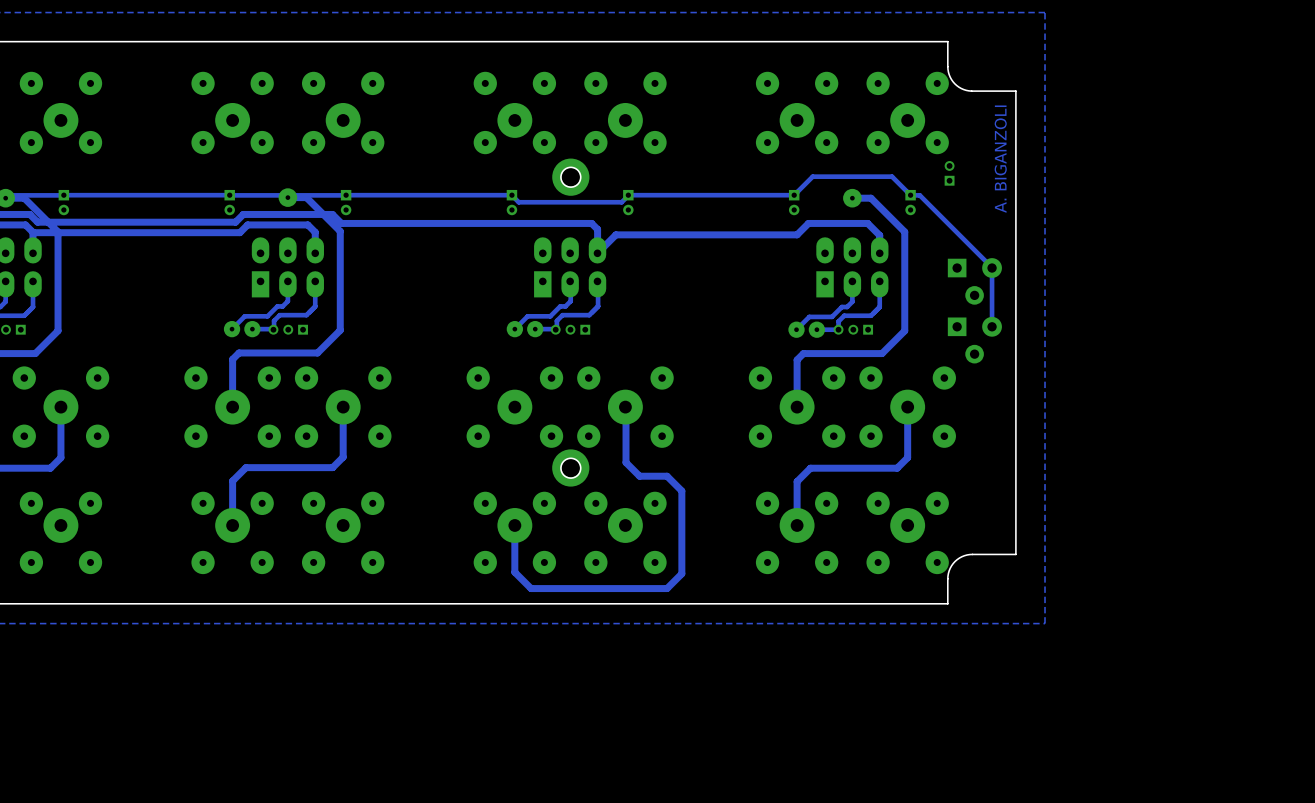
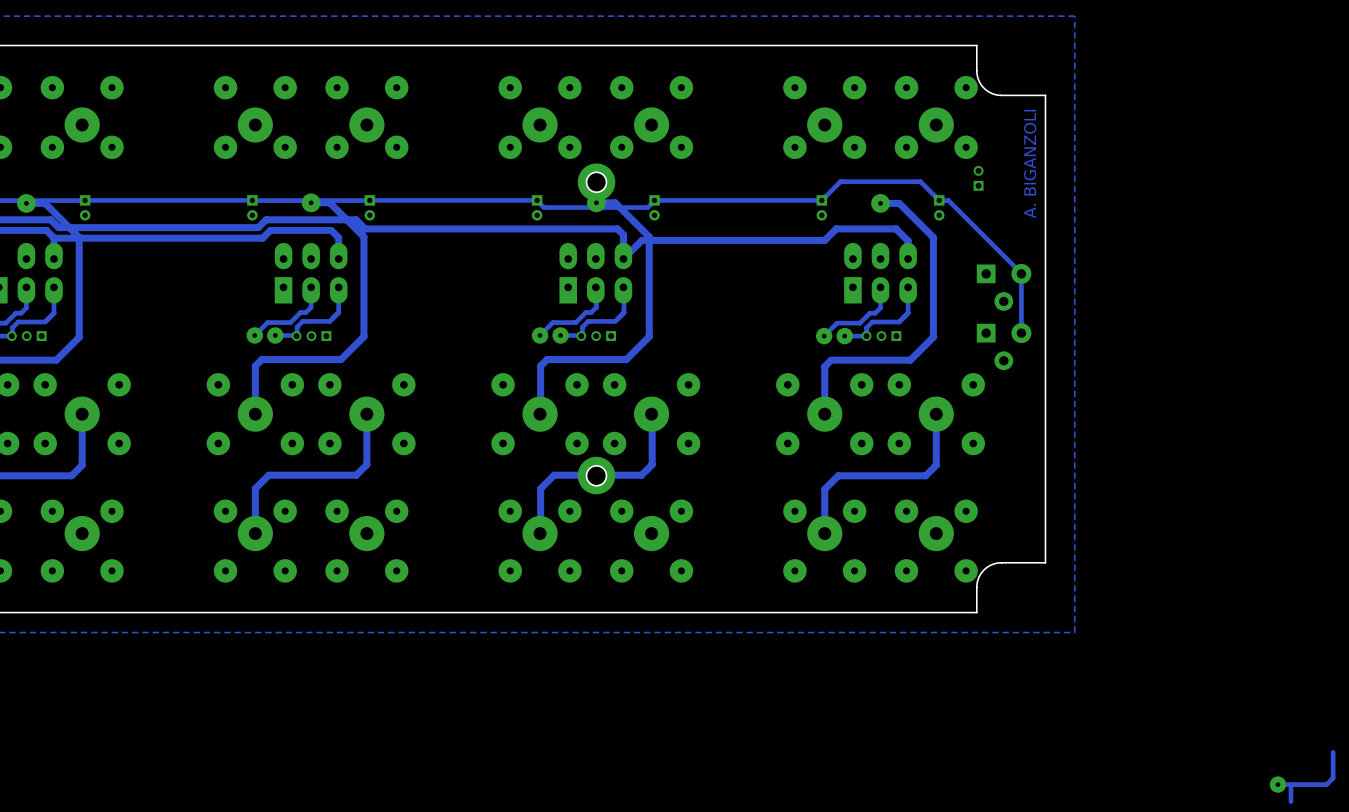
track: none -> (596, 202) (615, 202) (649, 236) (649, 336) (626, 359) (547, 359) (540, 366) (540, 413)
via: none -> (596, 202)
track: (626, 457) (626, 462) (639, 476) (667, 476) (681, 491) (681, 573) (667, 588) (531, 588) (514, 572) (514, 525) -> (652, 464) (641, 475) (554, 475) (540, 488) (540, 532)
track: none -> (1333, 752) (1333, 778) (1326, 784) (1277, 784)
via: none -> (1277, 784)
track: none -> (1290, 784) (1290, 801)

